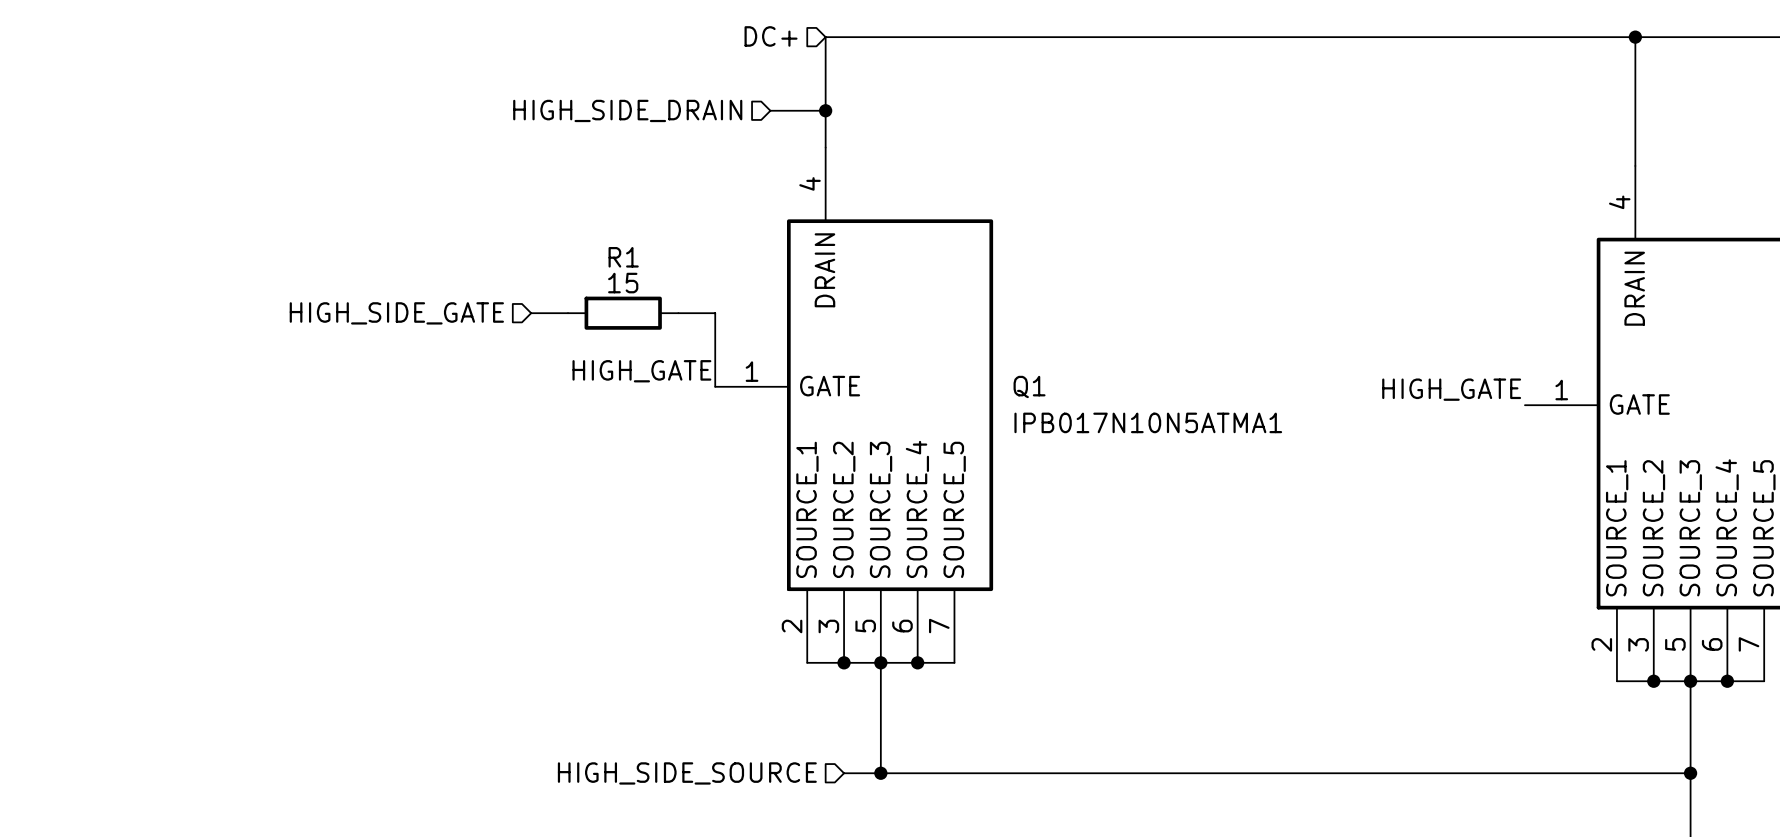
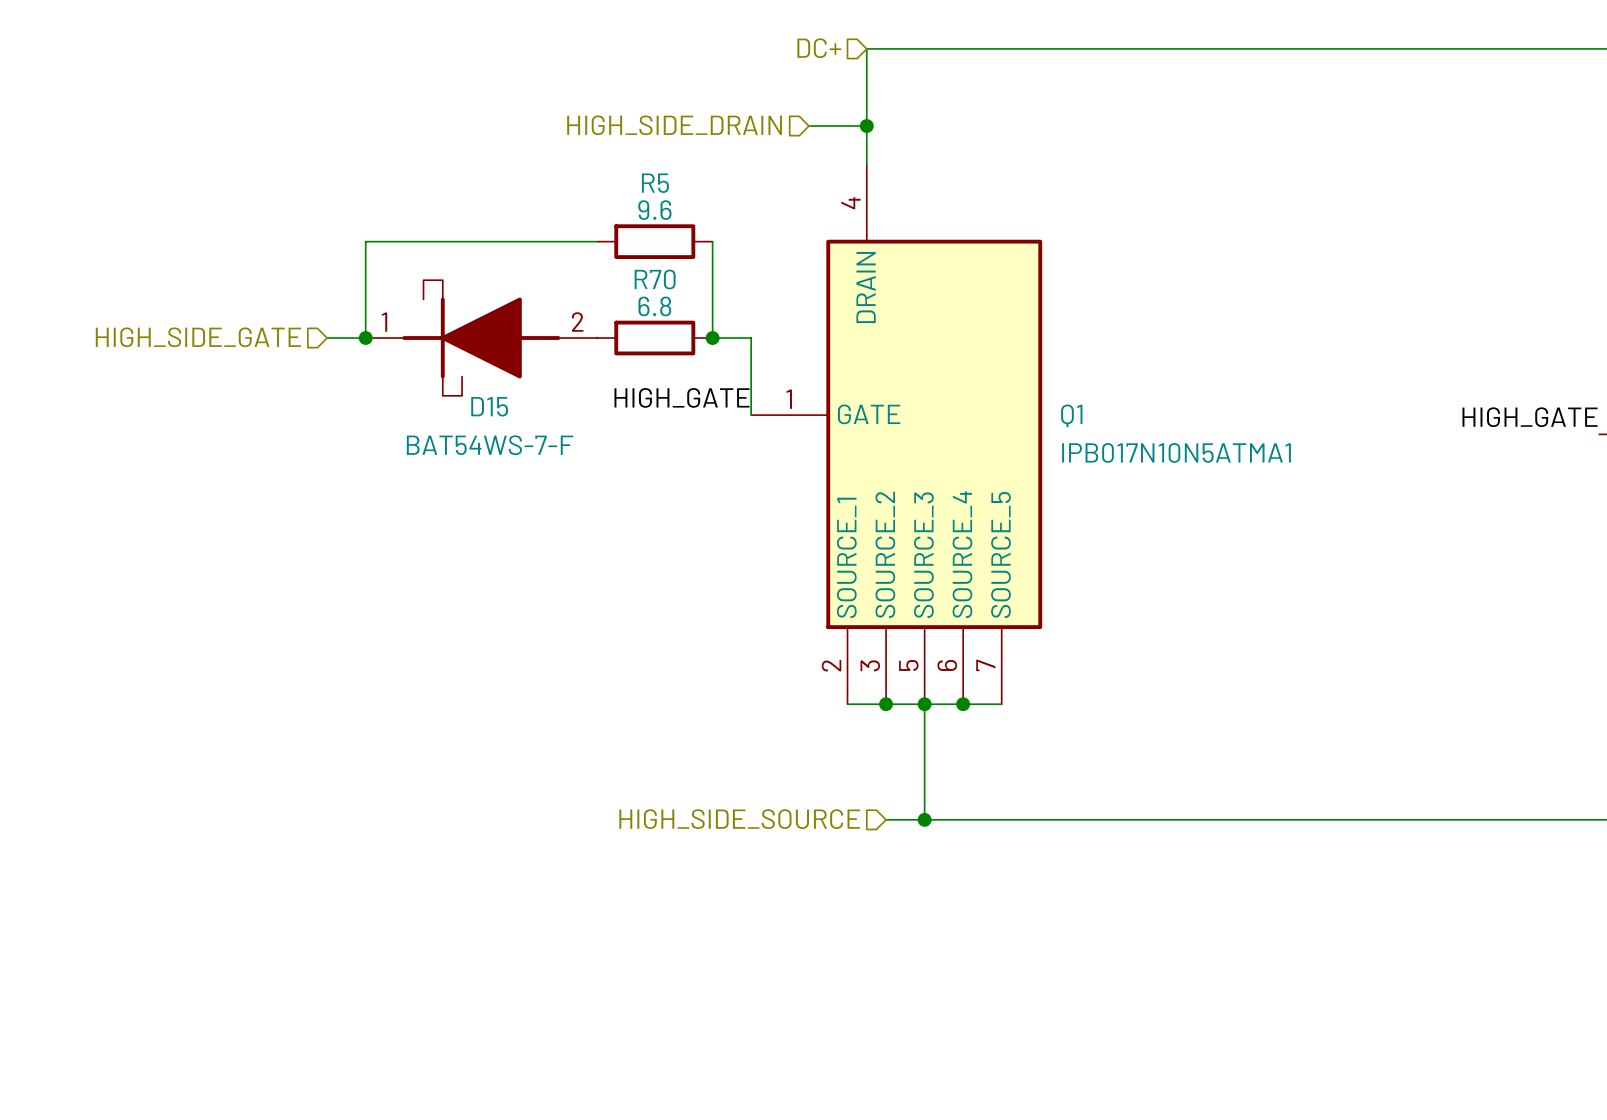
wire: none -> (596, 241) (365, 241) (365, 338) (327, 338)
R5: none -> 9.6 (654, 241)
wire: none -> (712, 241) (712, 338)
R1 name: R1 (623, 257) -> R70 (655, 279)
R1 value: 15 (623, 283) -> 6.8 (654, 306)
junction: none -> (365, 338)
hierarchical label position: HIGH_SIDE_GATE (396, 313) -> HIGH_SIDE_GATE (198, 337)
D15: none -> BAT54WS-7-F (481, 338)
junction: none -> (712, 338)

